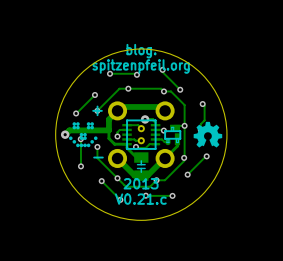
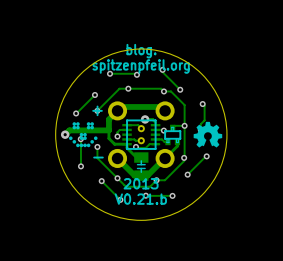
part footprint: [164, 124, 182, 146] -> [164, 124, 182, 146]
text: V0.21.c (140, 199) -> V0.21.b (140, 199)

